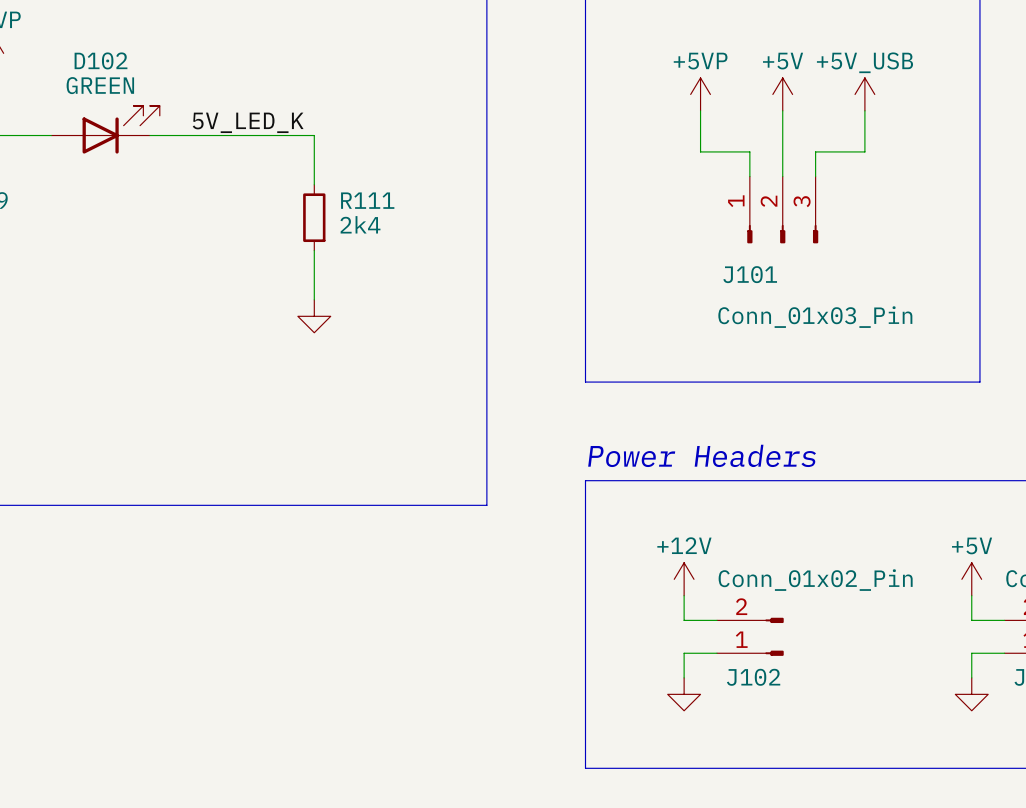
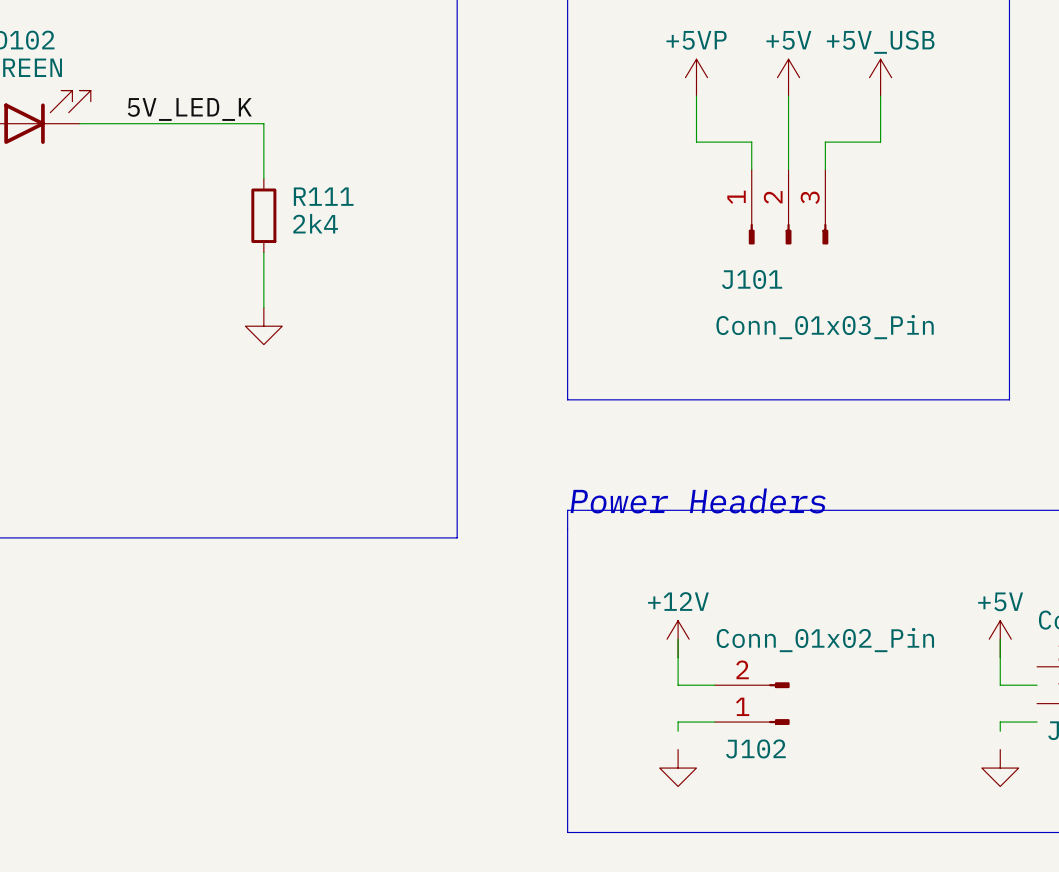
text position: Power Headers (702, 455) -> Power Headers (698, 500)
power symbol position: +12V (684, 579) -> +12V (678, 639)
power symbol position: +5V (971, 579) -> +5V (1000, 639)
wire: (684, 620) (716, 620) -> (678, 666) (678, 685) (714, 685)
wire: (971, 620) (1004, 620) -> (1000, 666) (1000, 685) (1037, 685)
J102 position: (750, 636) -> (752, 703)
wire: (716, 653) (684, 653) (684, 669) -> (714, 722) (678, 722)
wire: (1004, 653) (971, 653) (971, 669) -> (1037, 722) (1000, 722)
power symbol position: (684, 694) -> (678, 768)
power symbol position: (971, 694) -> (1000, 768)

